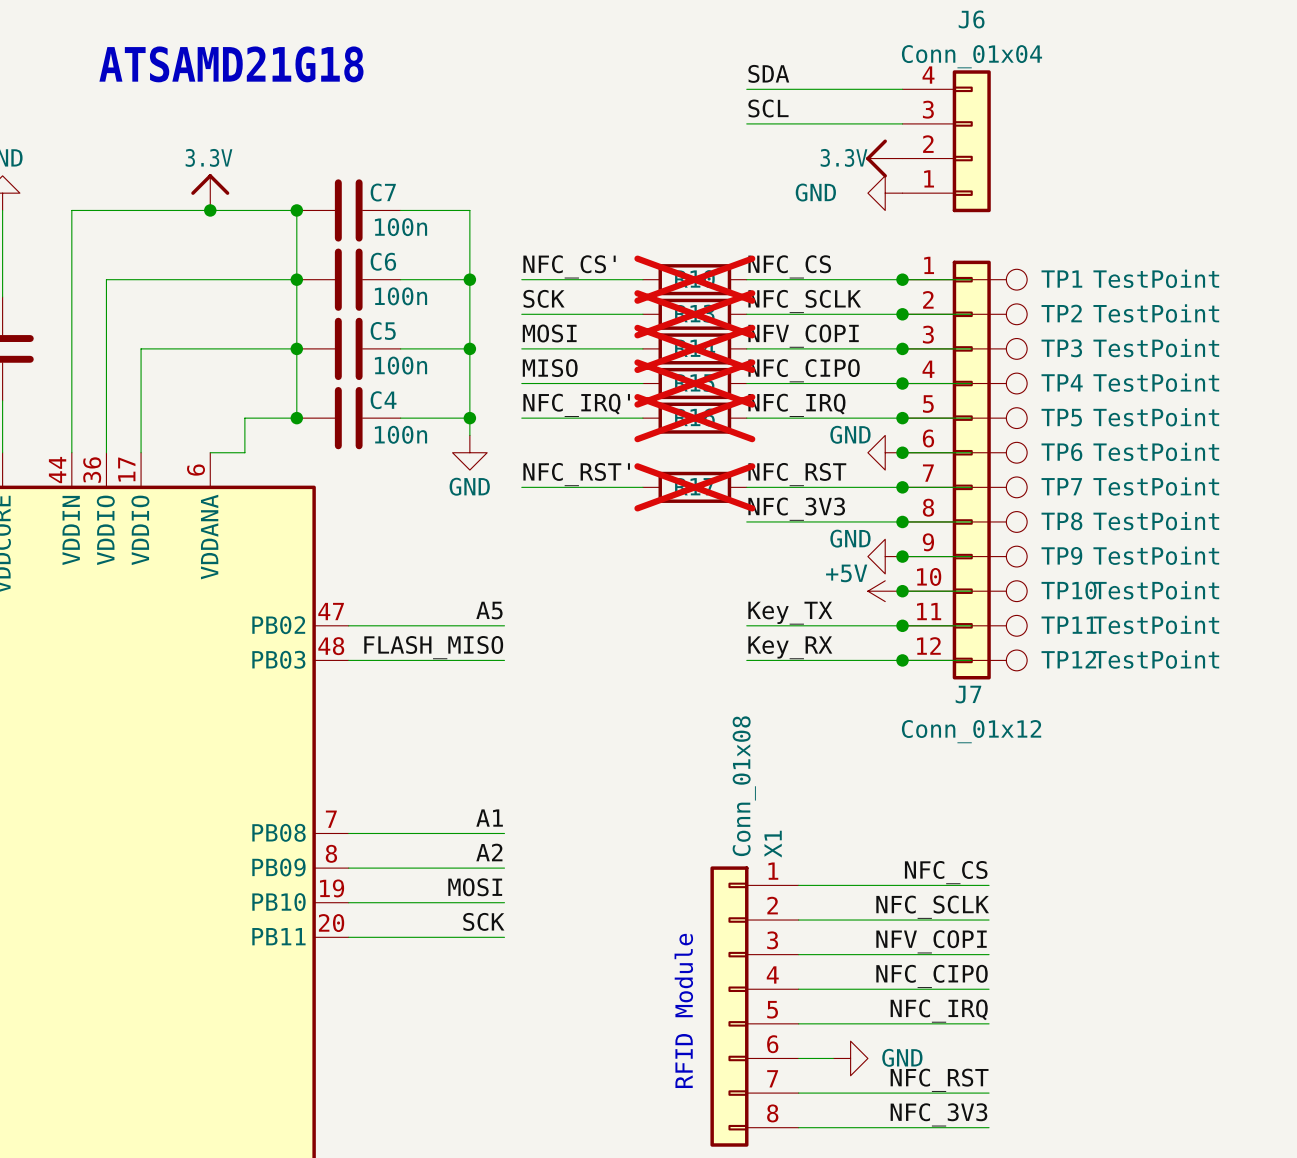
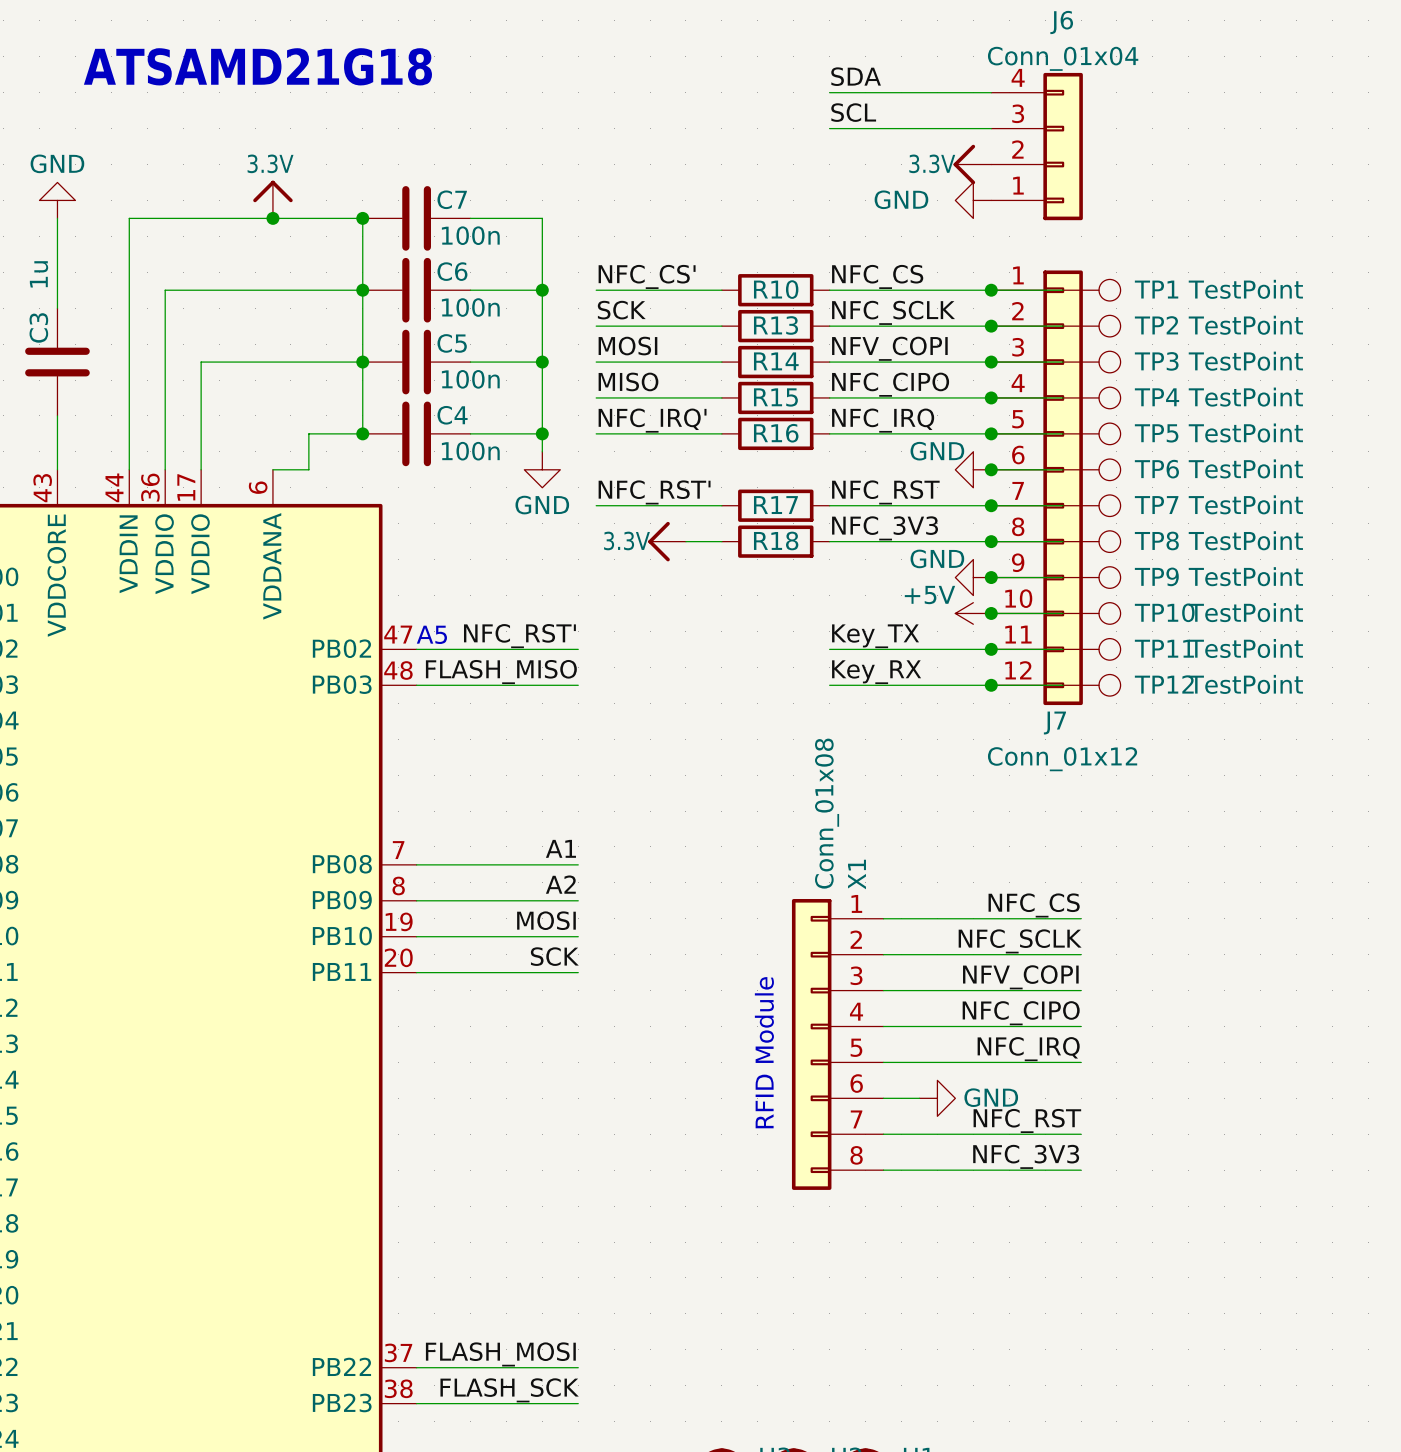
R10 do-not-place cross: (694, 279) -> none
R13 do-not-place cross: (694, 314) -> none
R14 do-not-place cross: (694, 348) -> none
R15 do-not-place cross: (694, 383) -> none
R16 do-not-place cross: (694, 418) -> none
R17 do-not-place cross: (694, 487) -> none
power symbol: none -> 3.3V (667, 541)
wire: none -> (685, 541) (721, 541)
R18: none -> (775, 541)
label: A5 (489, 610) -> NFC_RST' (519, 636)
text: none -> A5 (431, 634)

